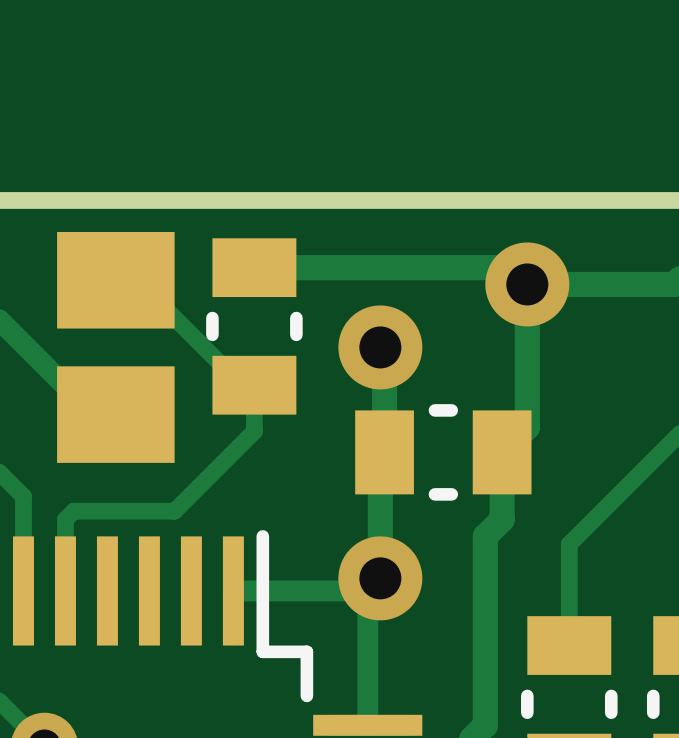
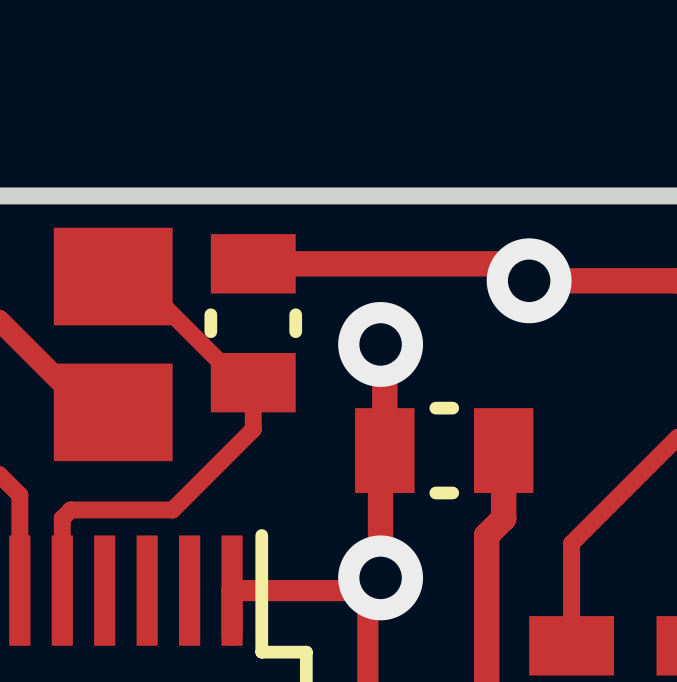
track: (527, 284) (527, 427) (502, 452) -> none

